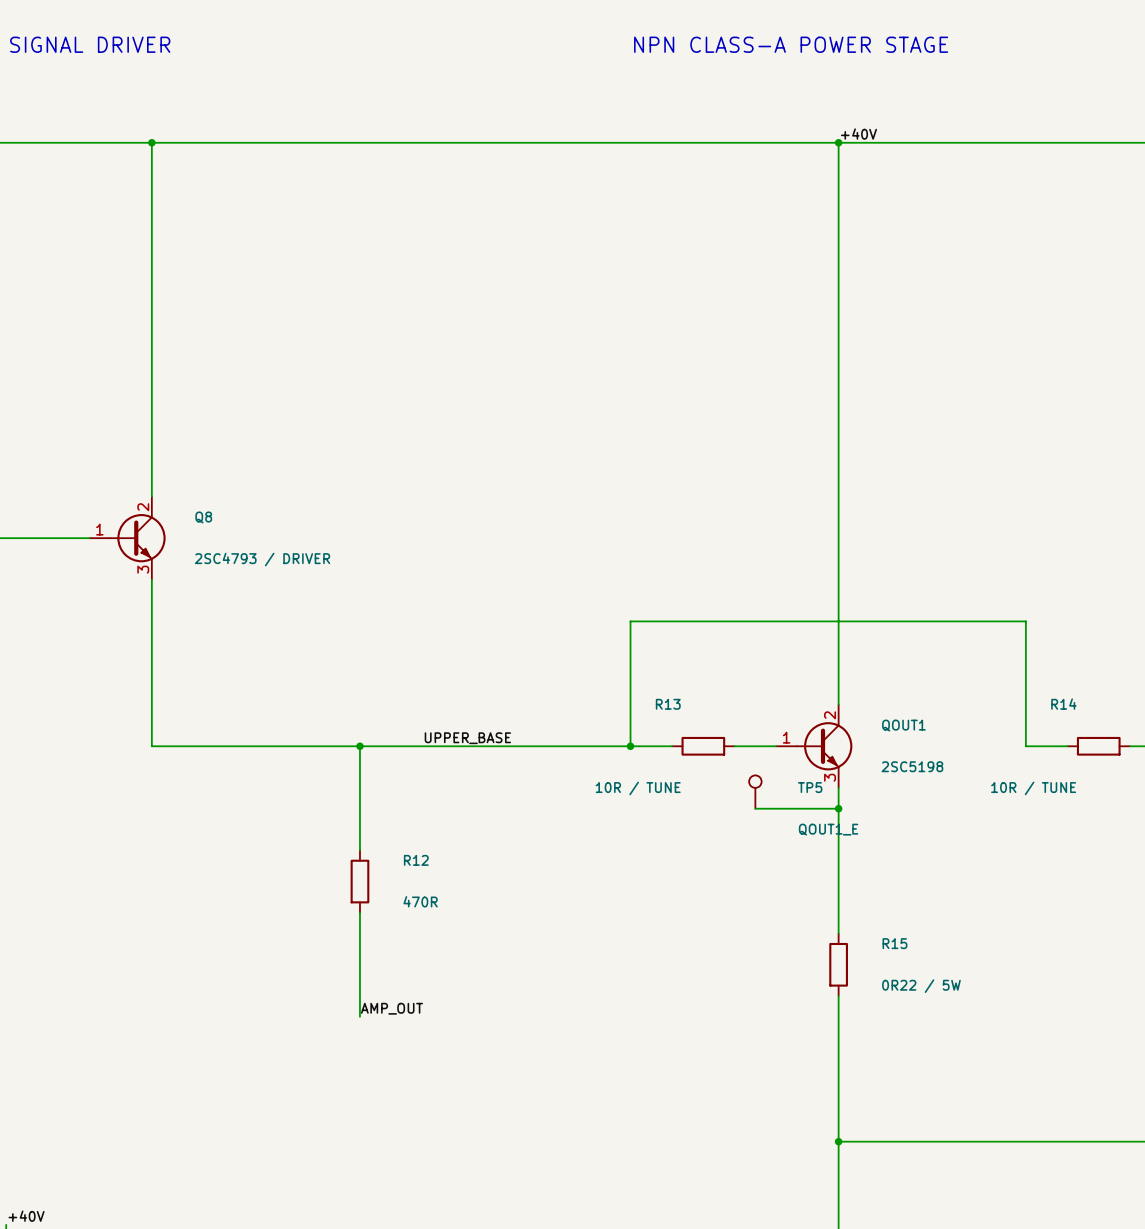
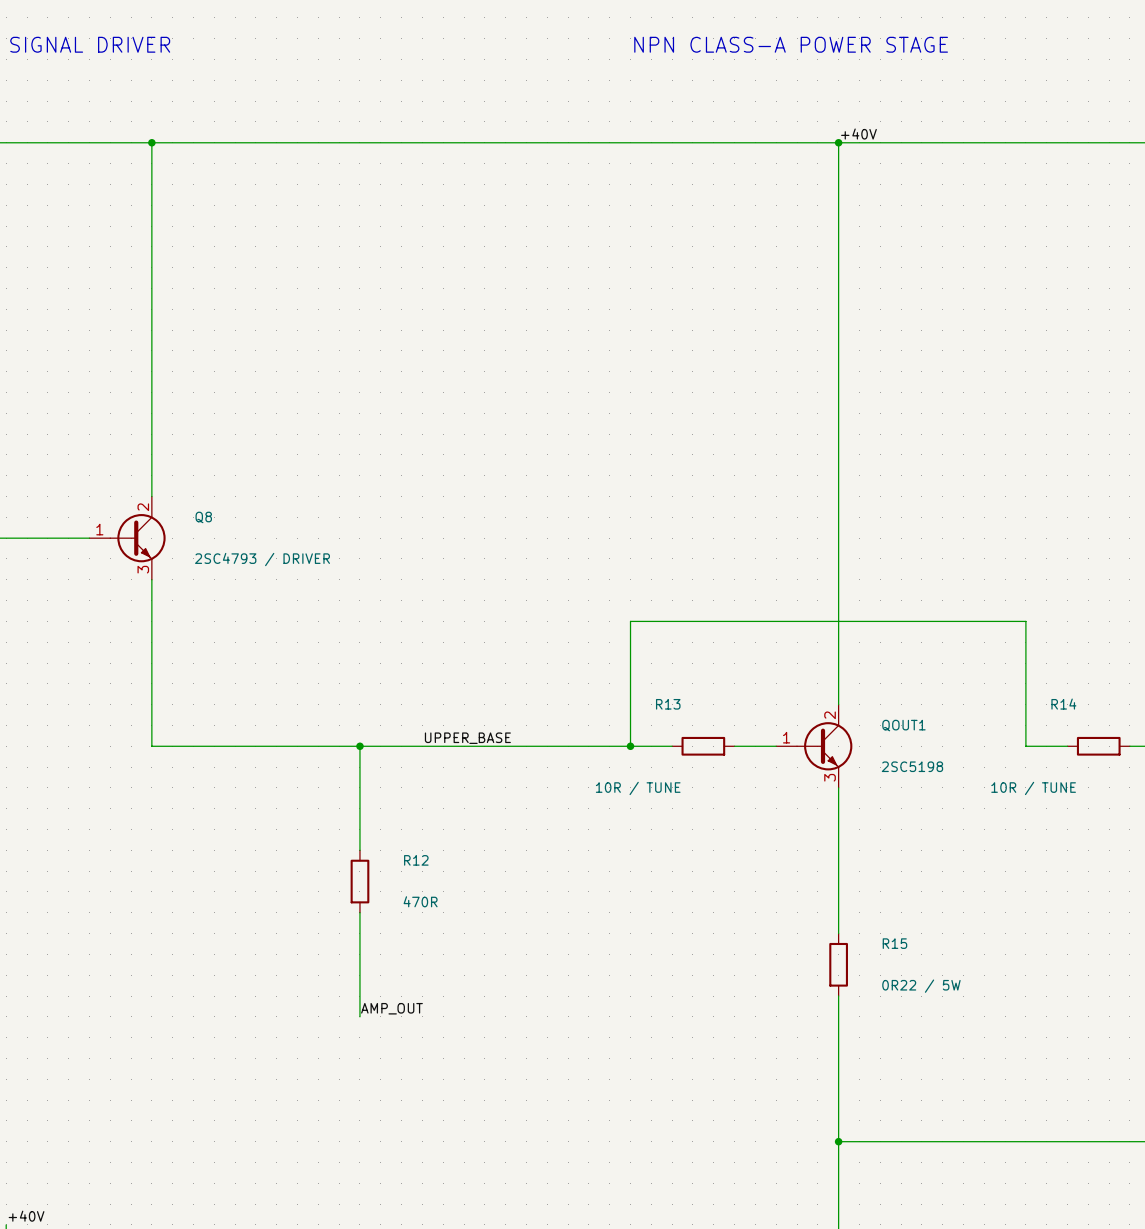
TP5: QOUT1_E (755, 792) -> none
wire: (755, 808) (838, 808) -> none
junction: (838, 808) -> none

